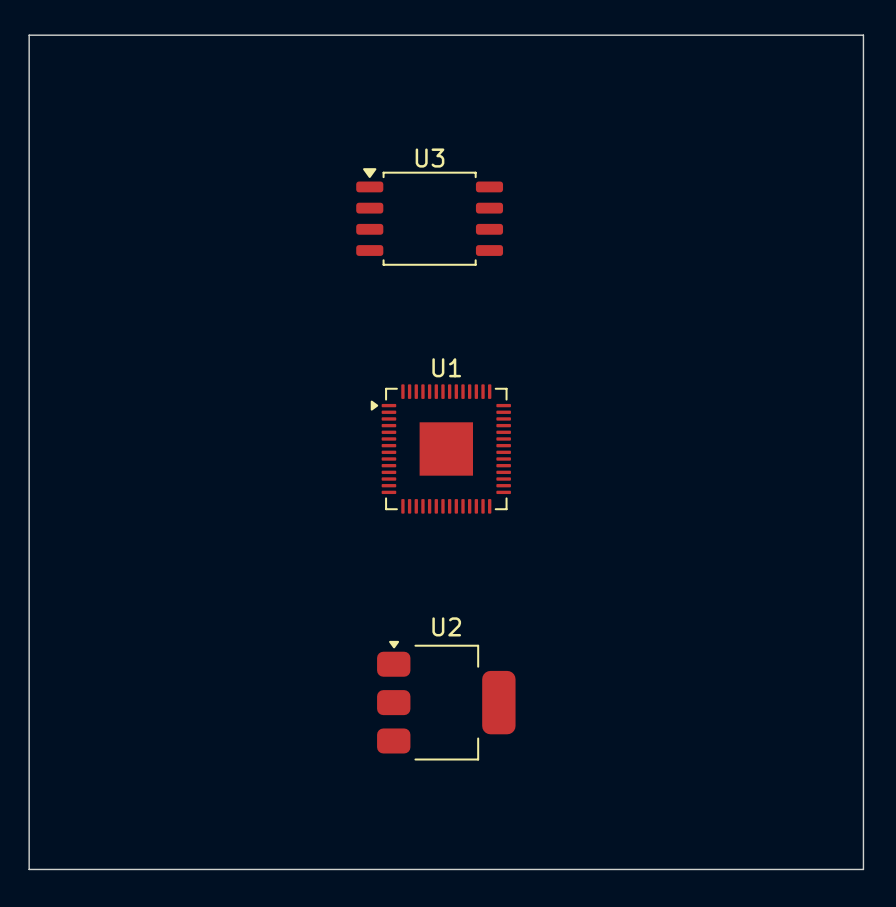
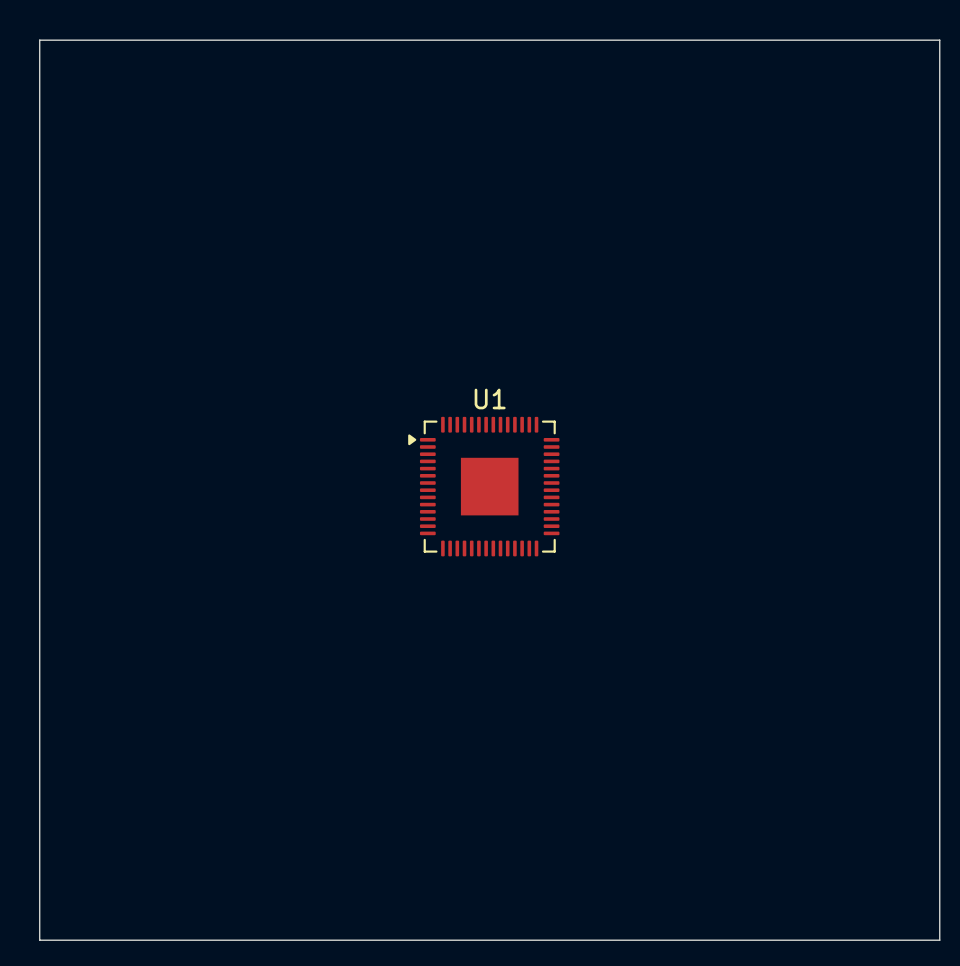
U3: (429, 216) -> none
U2: (446, 700) -> none

